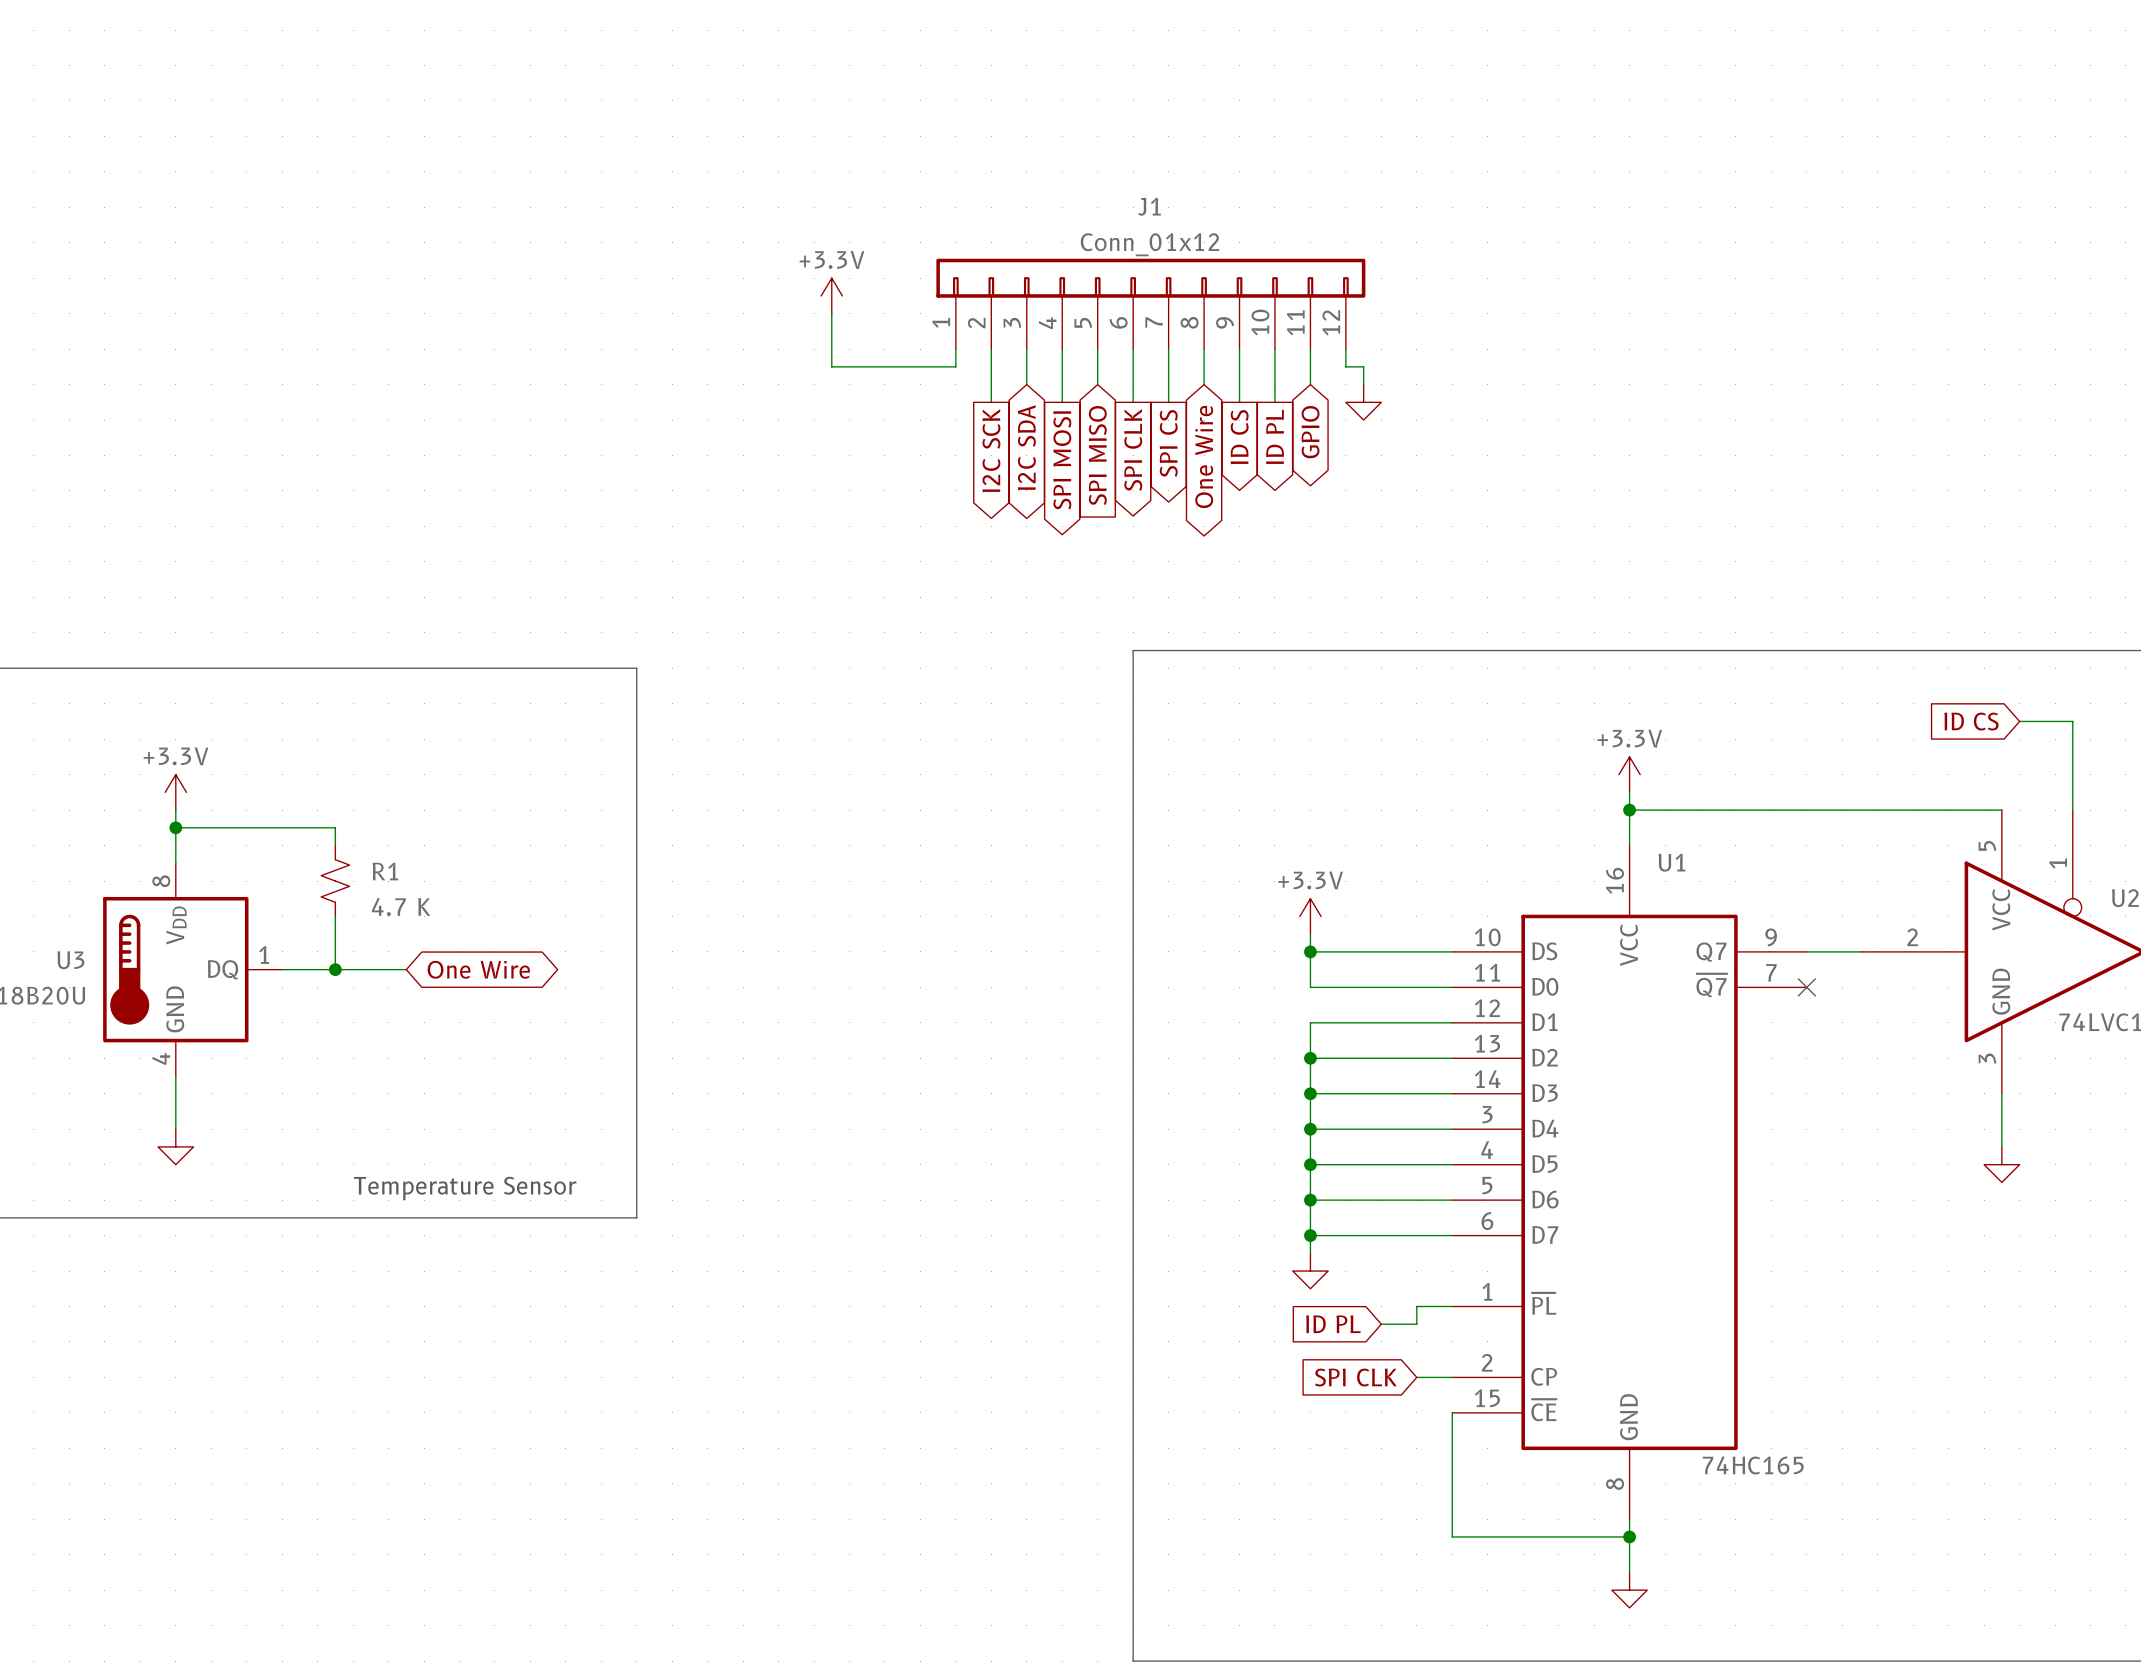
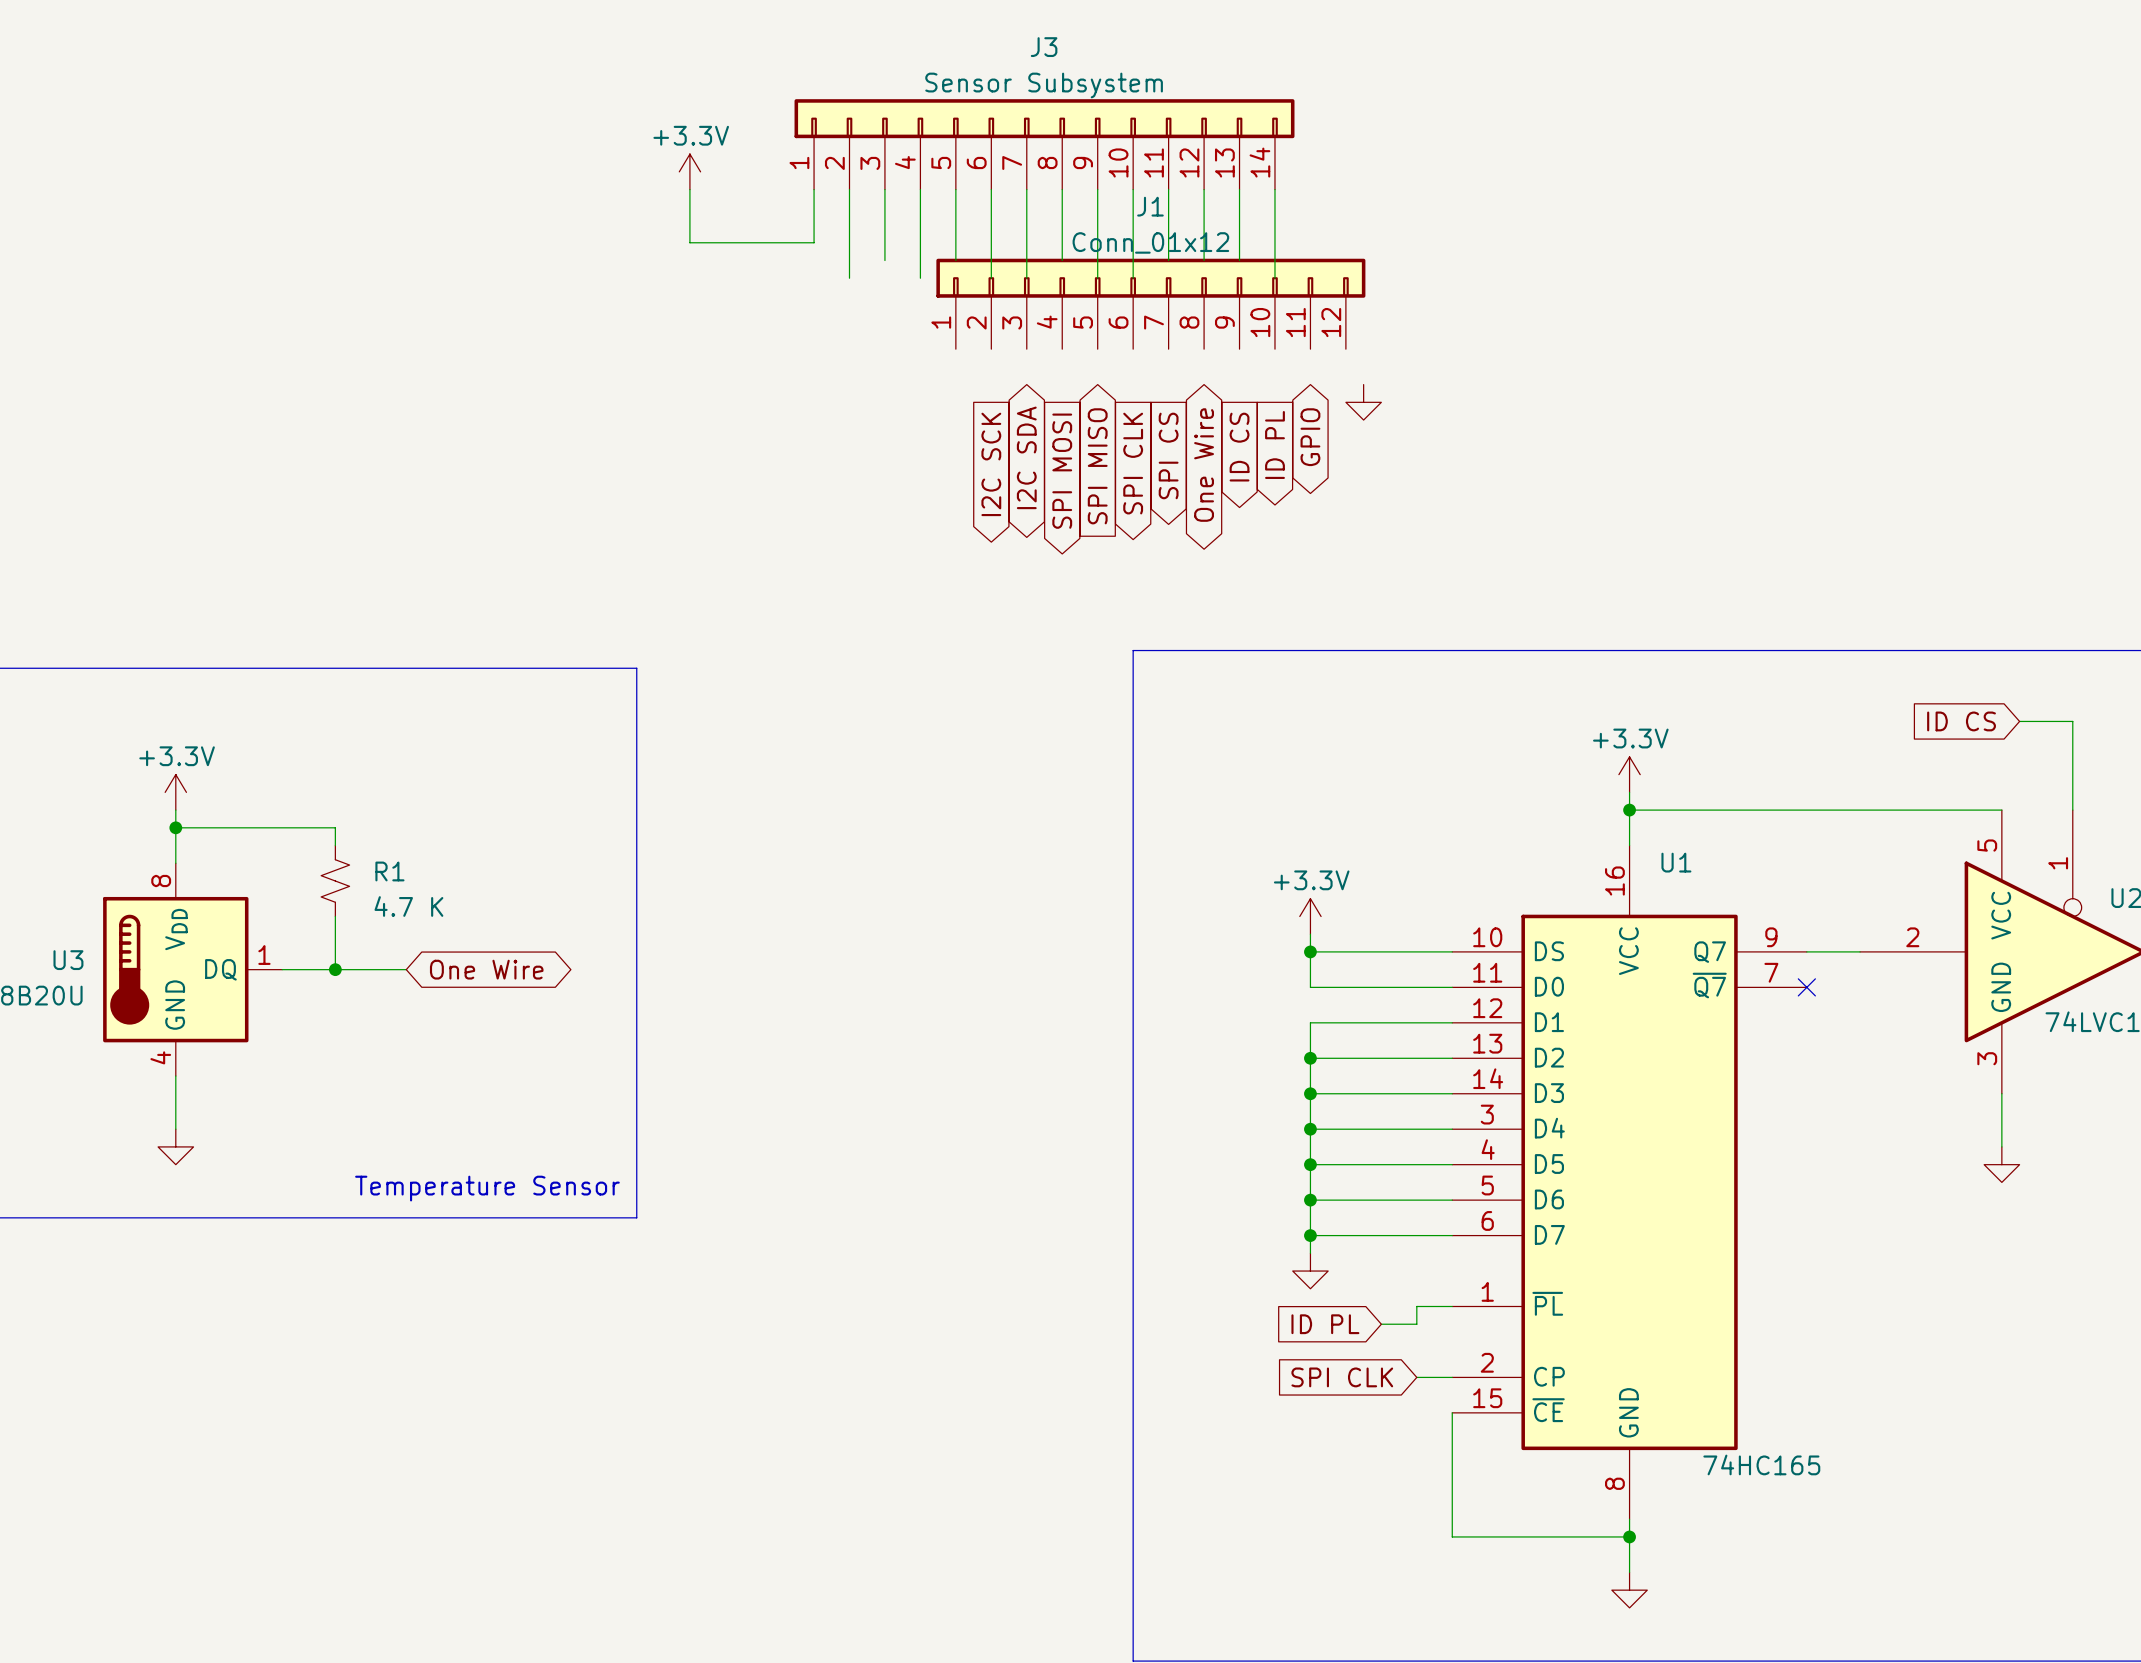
J3: none -> Sensor Subsystem (1044, 144)
wire: none -> (689, 189) (689, 242) (814, 242) (814, 189)
wire: none -> (849, 189) (849, 278)
wire: none -> (884, 189) (884, 260)
wire: none -> (920, 189) (920, 278)
wire: none -> (955, 189) (955, 260)
wire: none -> (991, 189) (991, 278)
wire: none -> (1026, 189) (1026, 278)
wire: none -> (1062, 189) (1062, 260)
wire: none -> (1097, 189) (1097, 278)
wire: none -> (1133, 189) (1133, 278)
wire: none -> (1168, 189) (1168, 260)
wire: none -> (1204, 189) (1204, 260)
wire: none -> (1239, 189) (1239, 260)
wire: none -> (1274, 189) (1274, 278)
power symbol position: +3.3V (831, 295) -> +3.3V (689, 171)
wire: (831, 313) (831, 366) (955, 366) (955, 349) -> none
wire: (991, 349) (991, 402) -> none
wire: (1026, 349) (1026, 384) -> none
wire: (1062, 349) (1062, 402) -> none
wire: (1097, 349) (1097, 384) -> none
wire: (1133, 349) (1133, 402) -> none
wire: (1168, 349) (1168, 402) -> none
wire: (1204, 349) (1204, 384) -> none
wire: (1239, 349) (1239, 402) -> none
wire: (1274, 349) (1274, 402) -> none
wire: (1310, 349) (1310, 384) -> none
wire: (1345, 349) (1345, 366) (1363, 366) (1363, 384) -> none

